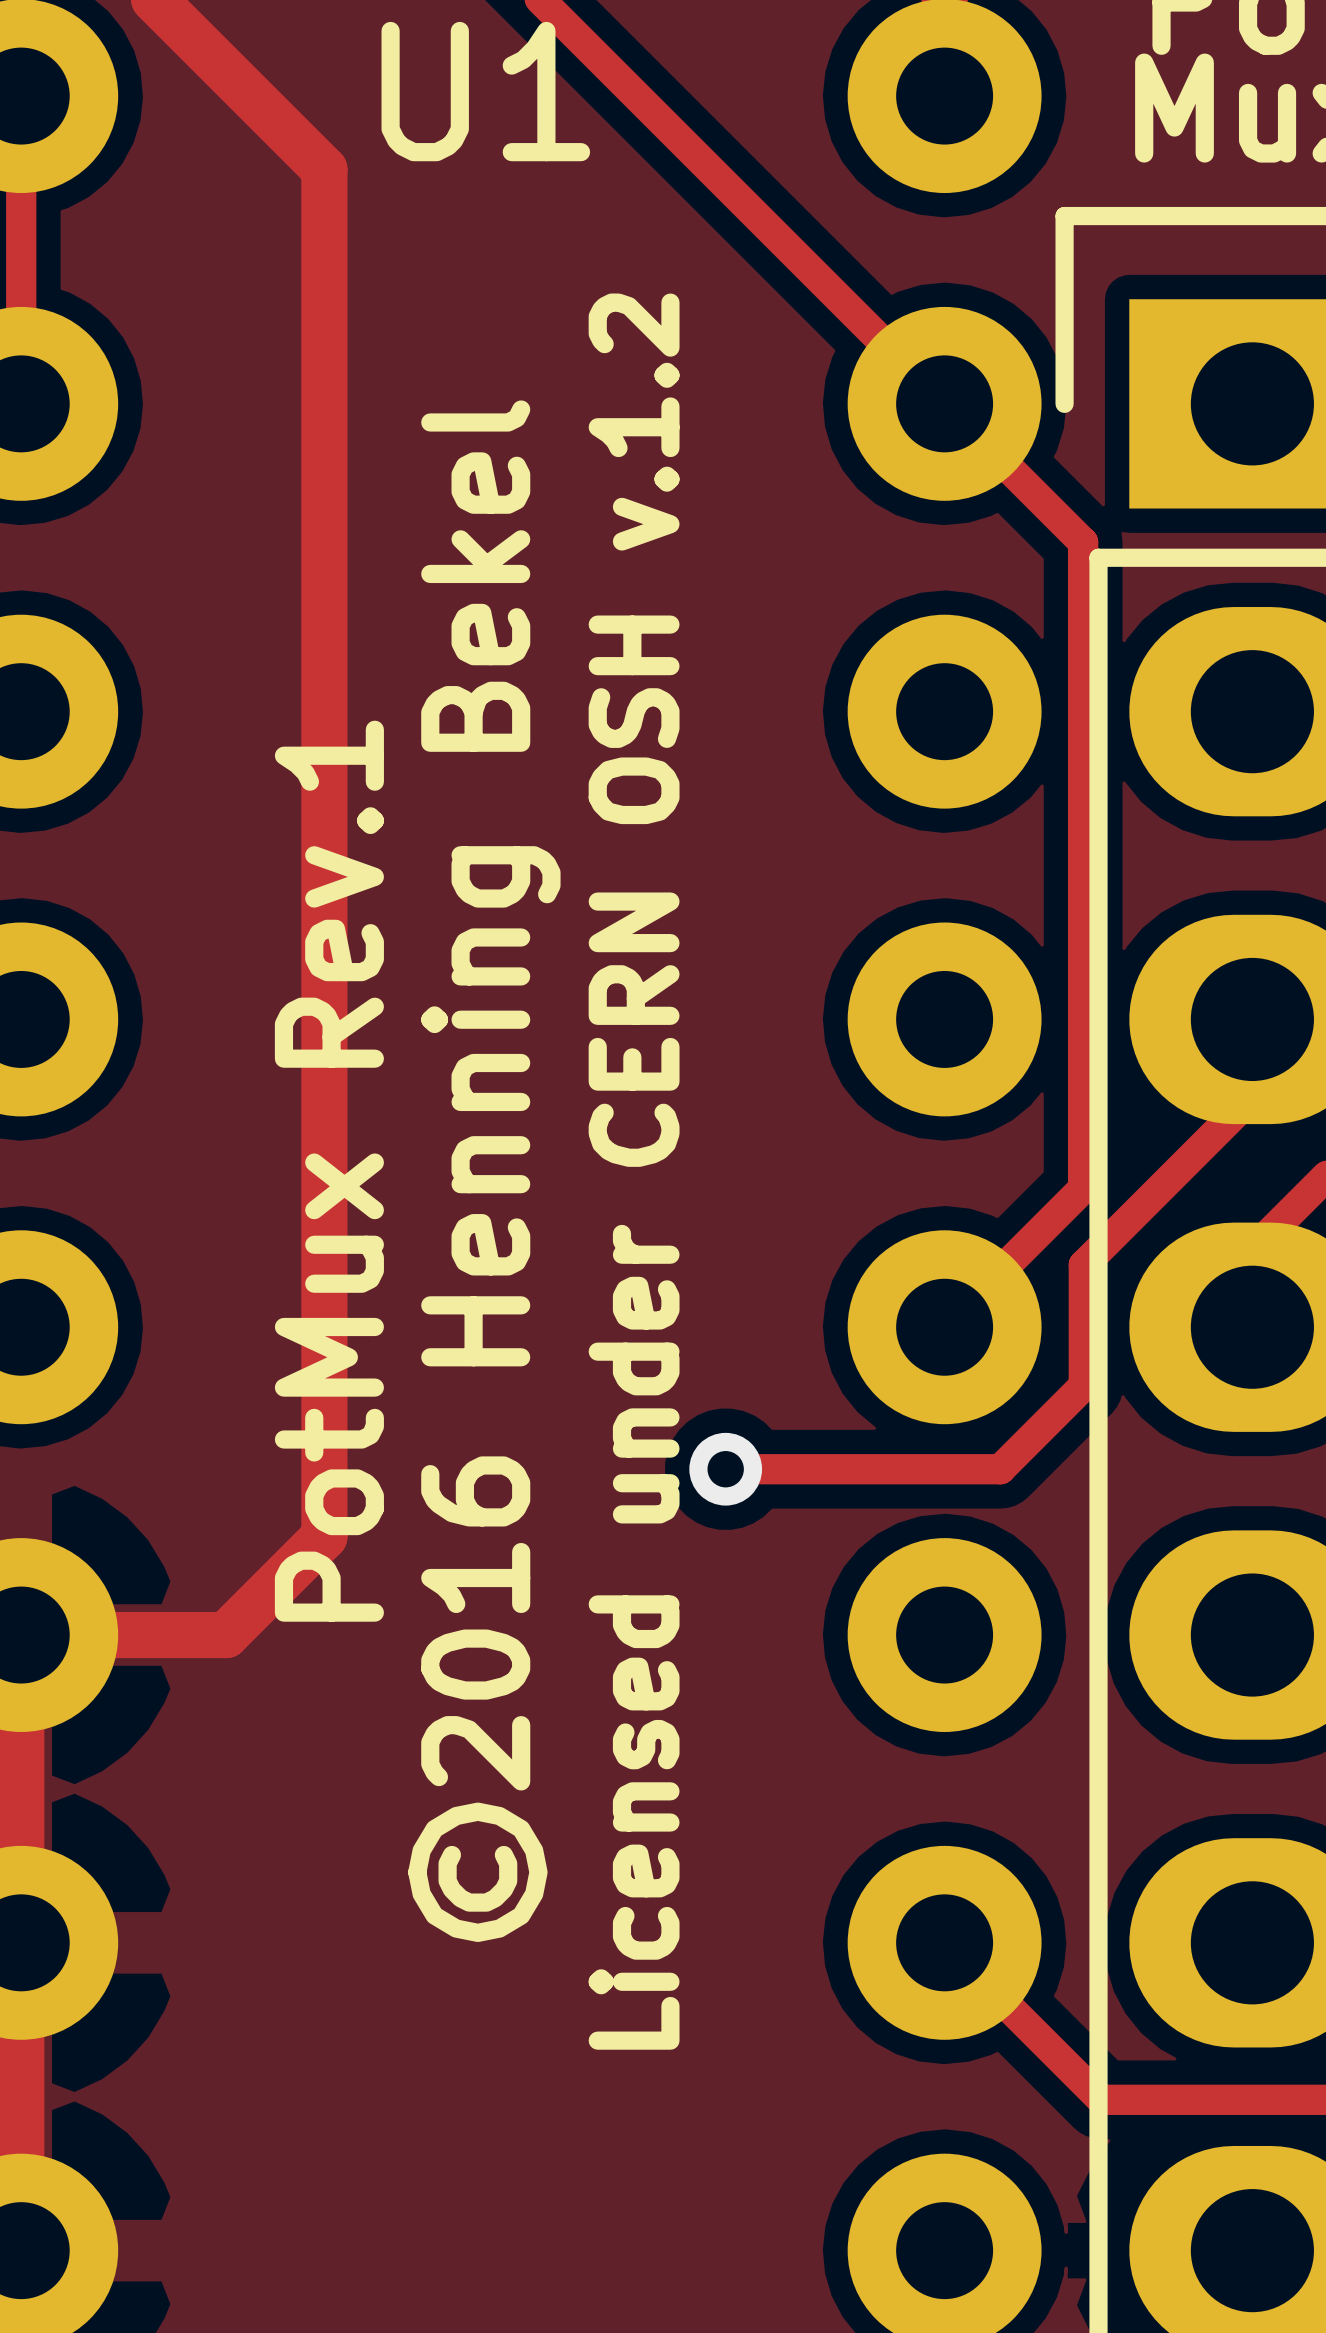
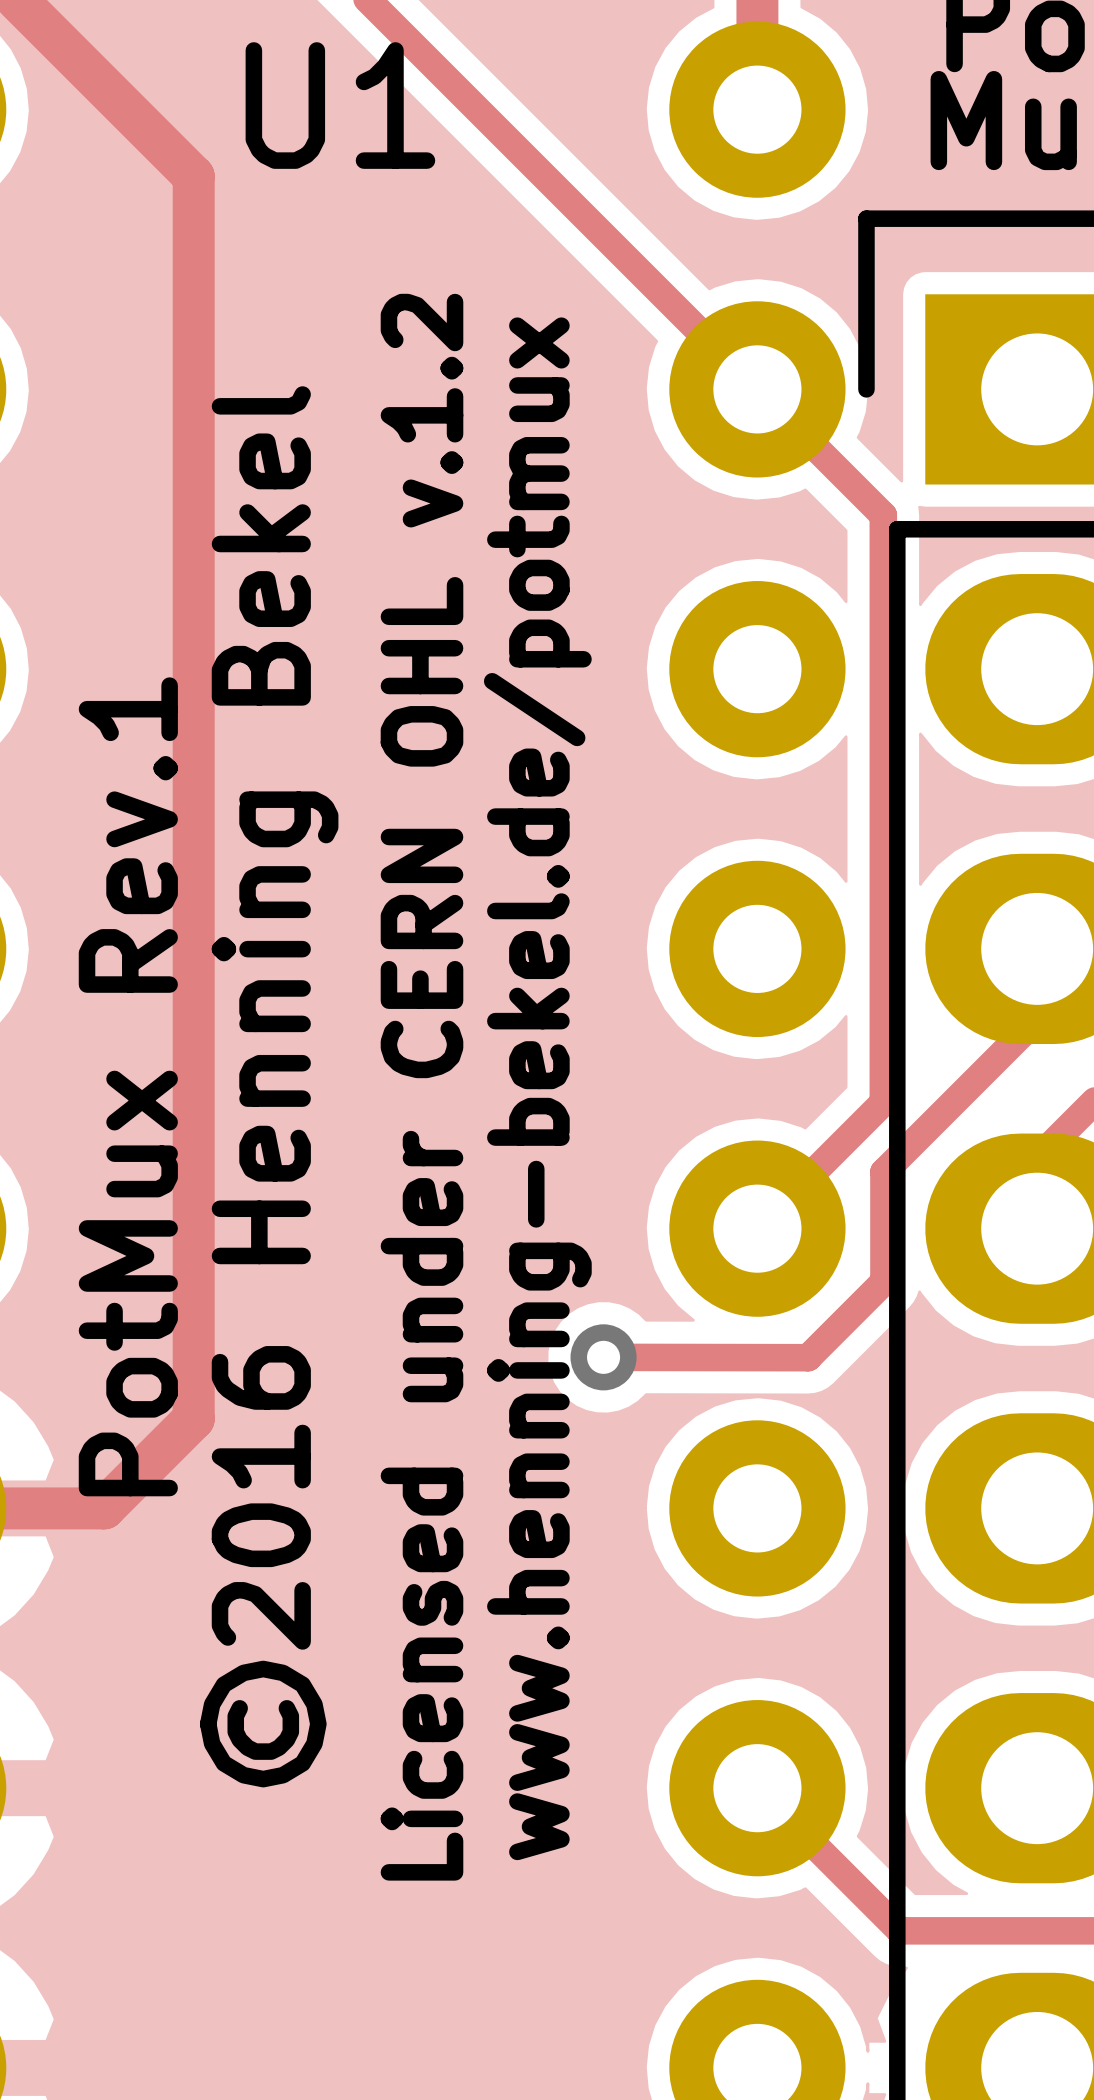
text position: PotMux Rev.1 (329, 1171) -> PotMux Rev.1 (128, 1086)
text position: ©2016 Henning Bekel (484, 1171) -> ©2016 Henning Bekel (269, 1086)
text: Licensed under CERN OSH v.1.2 (634, 1171) -> Licensed under CERN OHL v.1.2 (422, 1087)
text: none -> www.henning-bekel.de/potmux (537, 1088)
track: (725, 1469) (1000, 1469) -> (603, 1357) (808, 1357)
via position: (725, 1469) -> (603, 1357)

